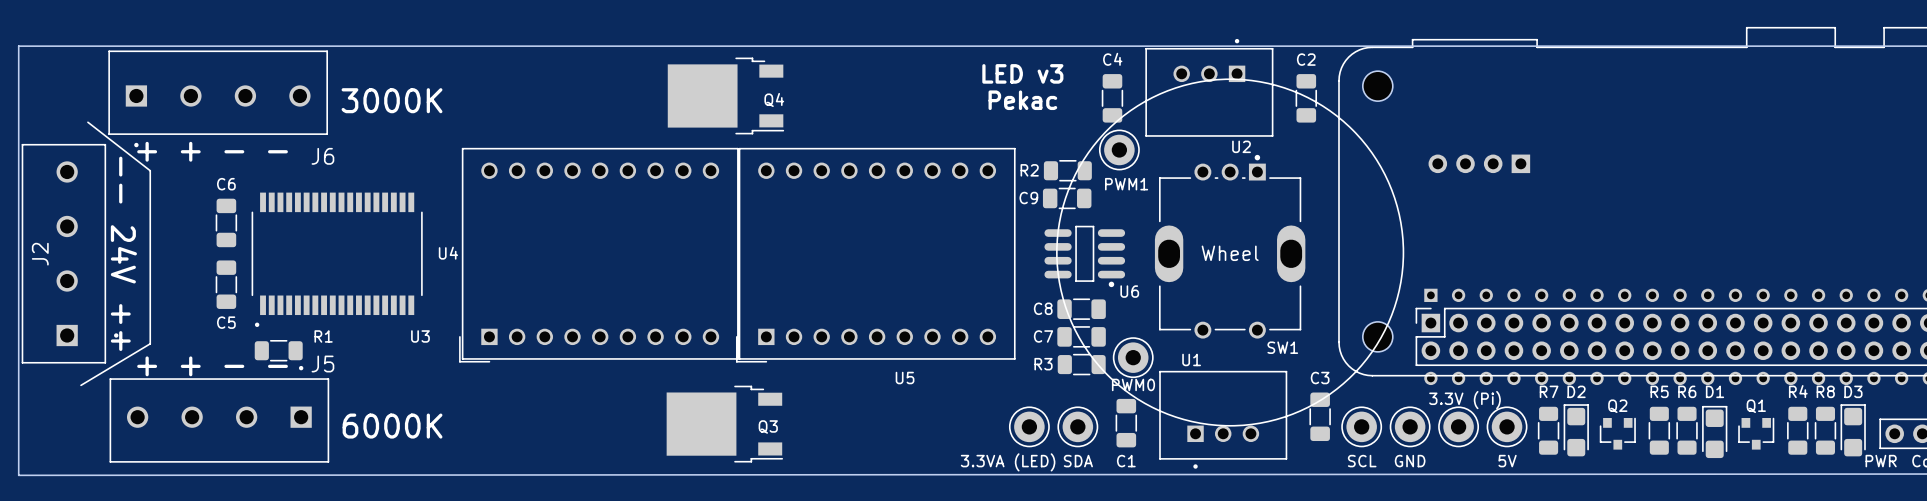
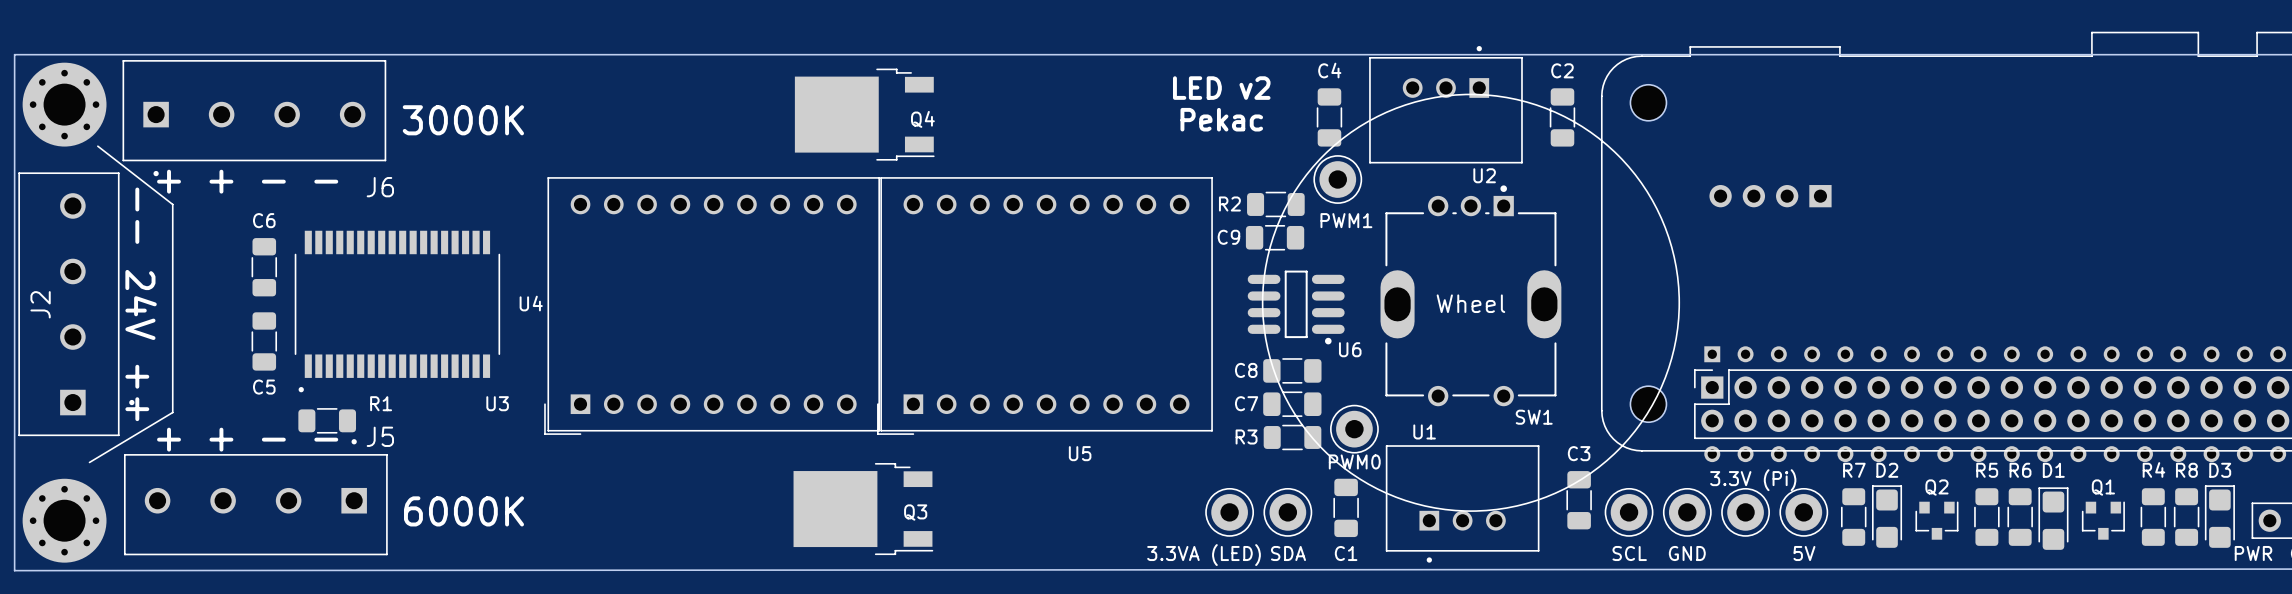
text: LED v3 (1022, 73) -> LED v2 (1221, 88)
part: none -> (64, 104)
part: none -> (64, 520)

